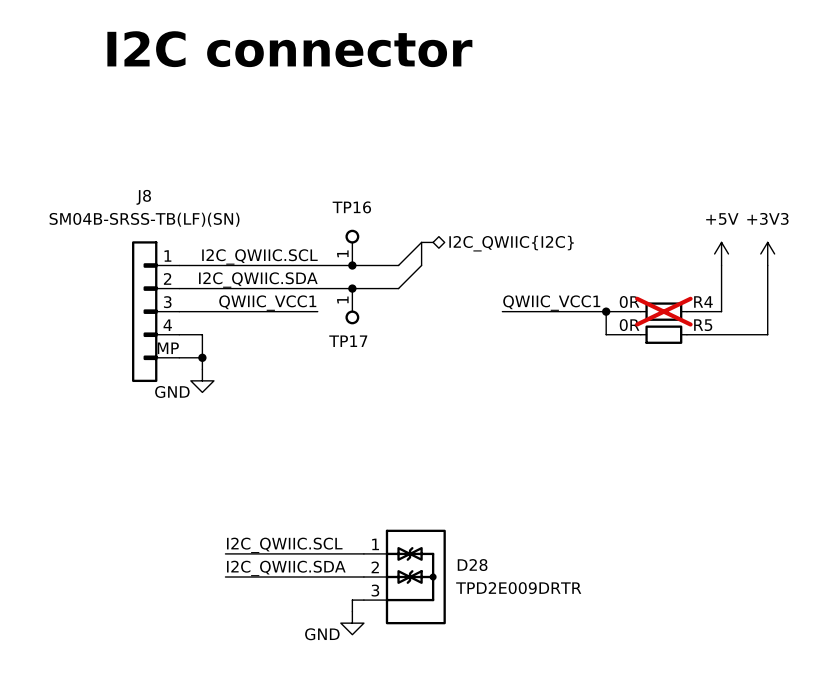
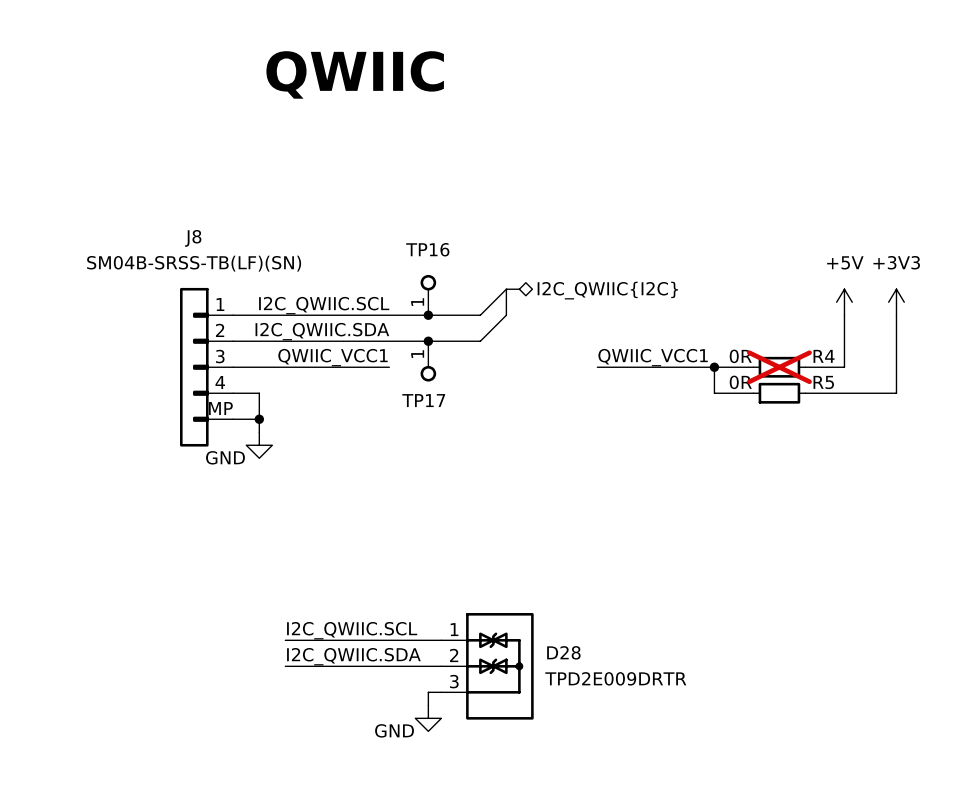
text: I2C connector (289, 49) -> QWIIC (355, 74)

